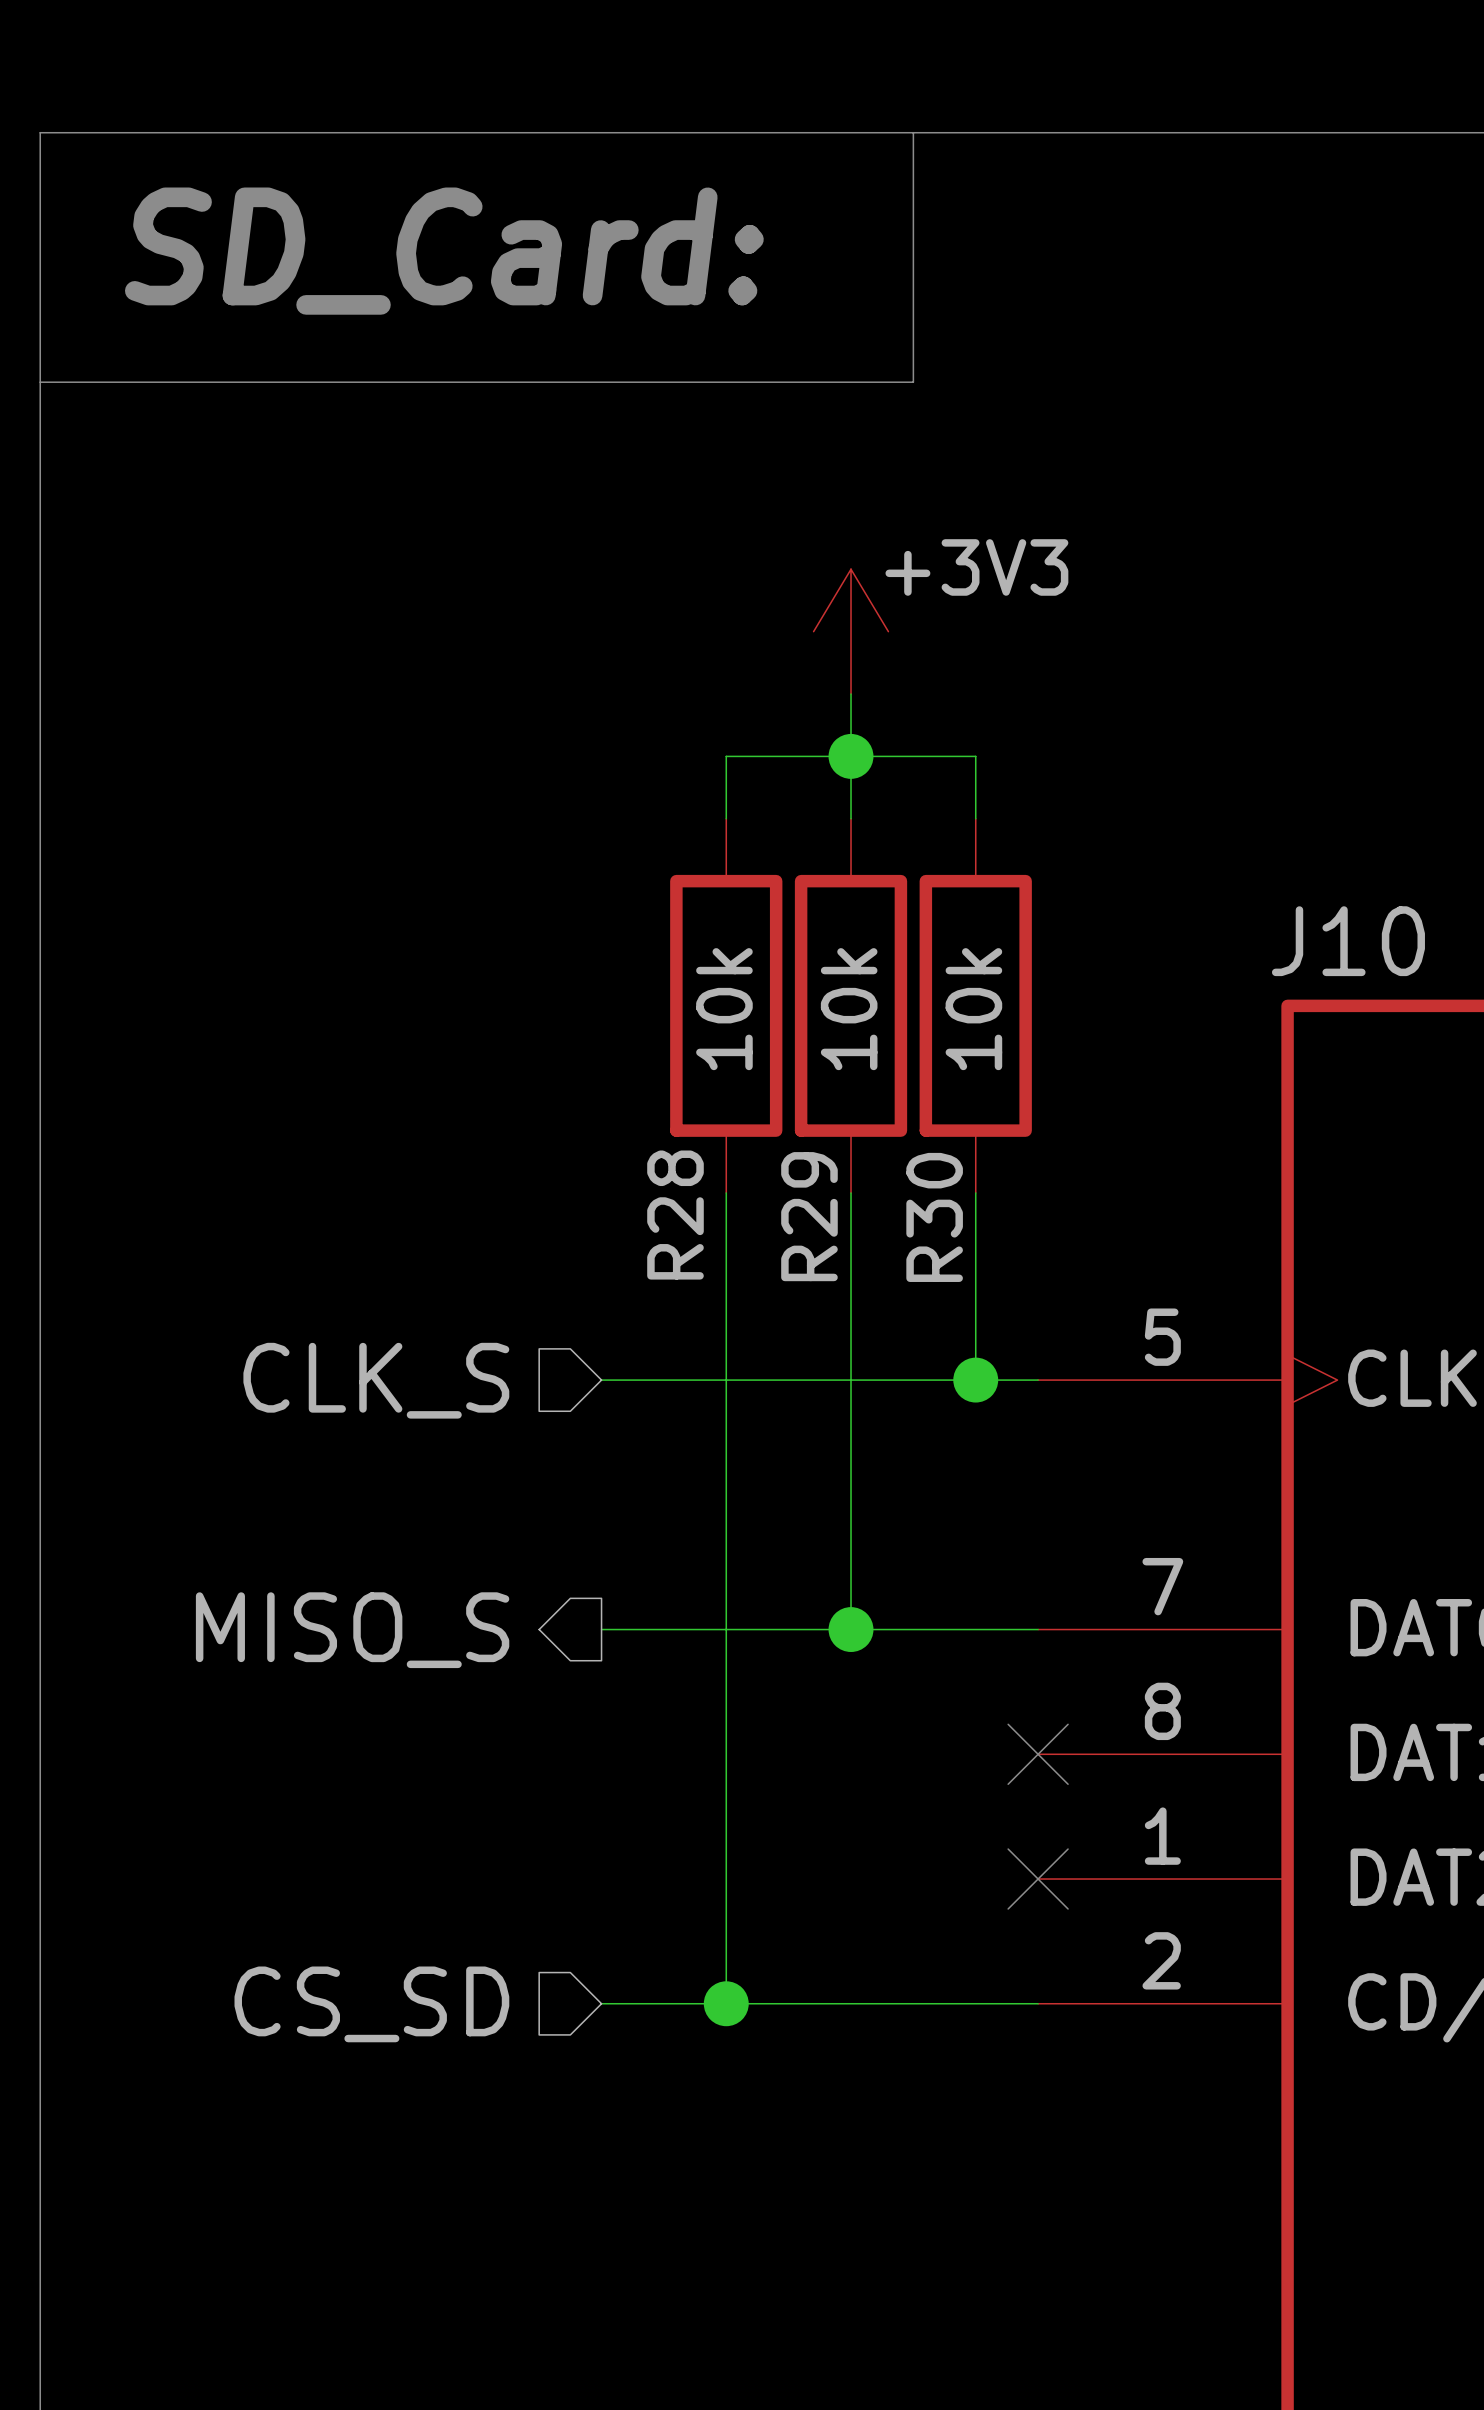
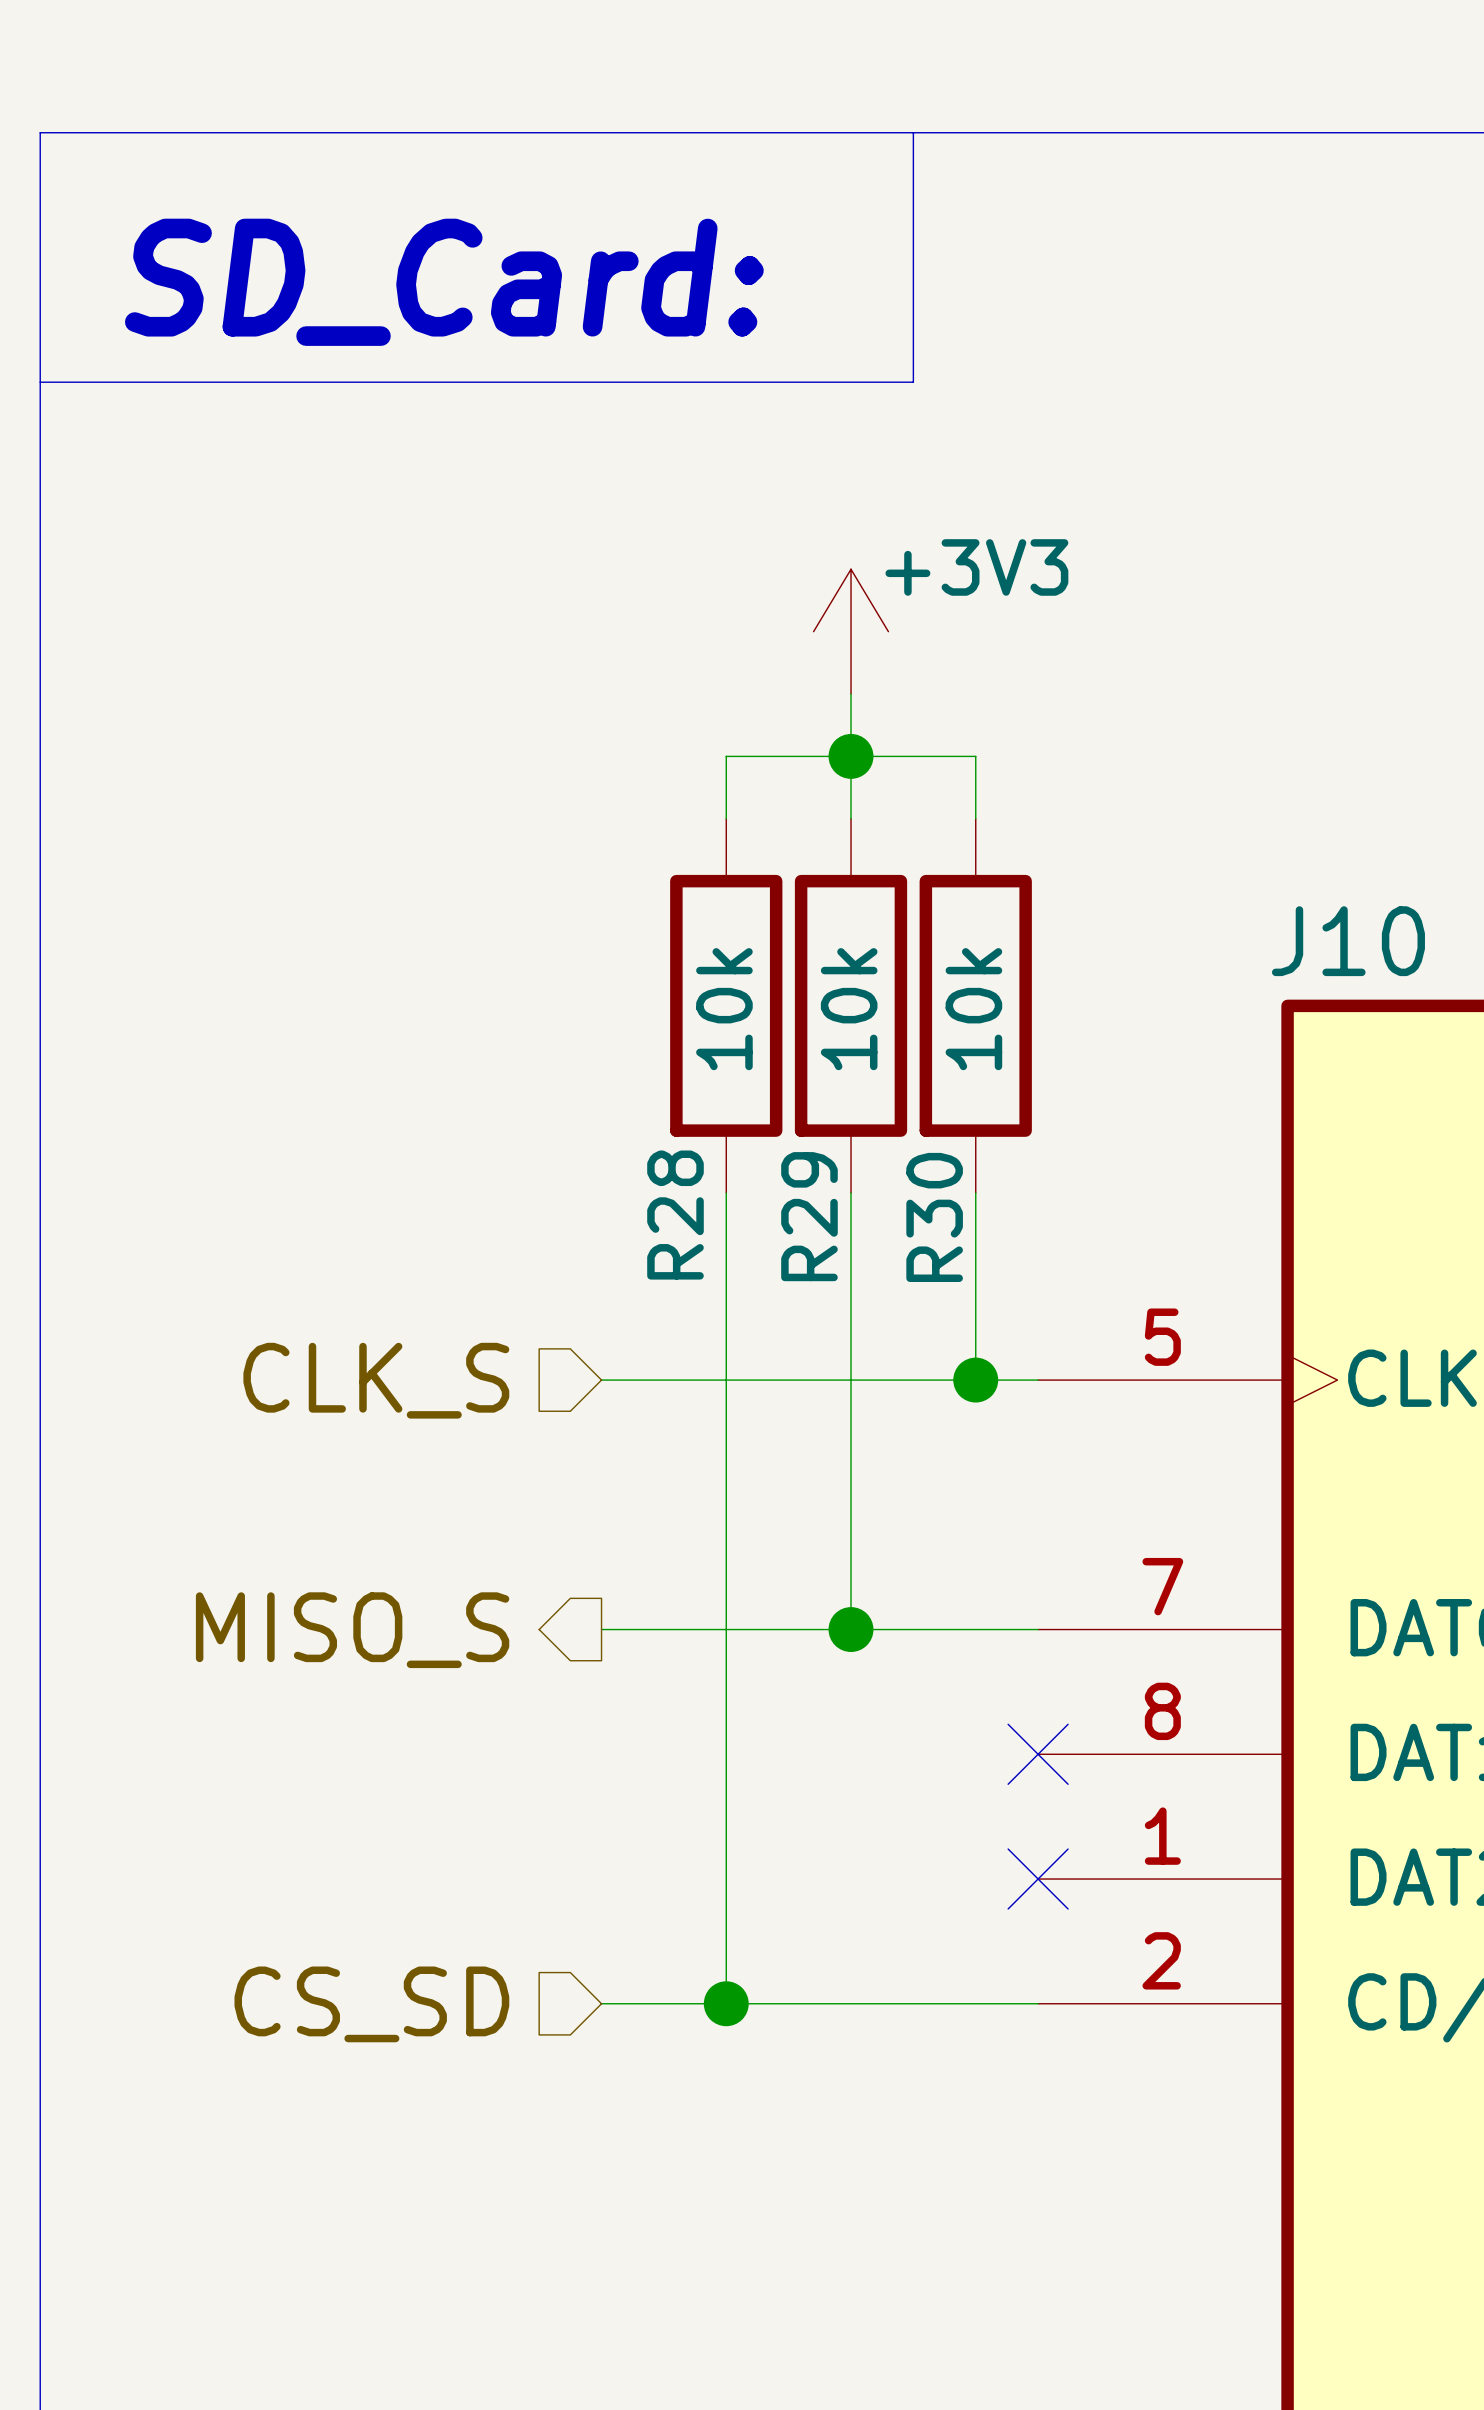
text position: SD_Card: (444, 251) -> SD_Card: (444, 282)

